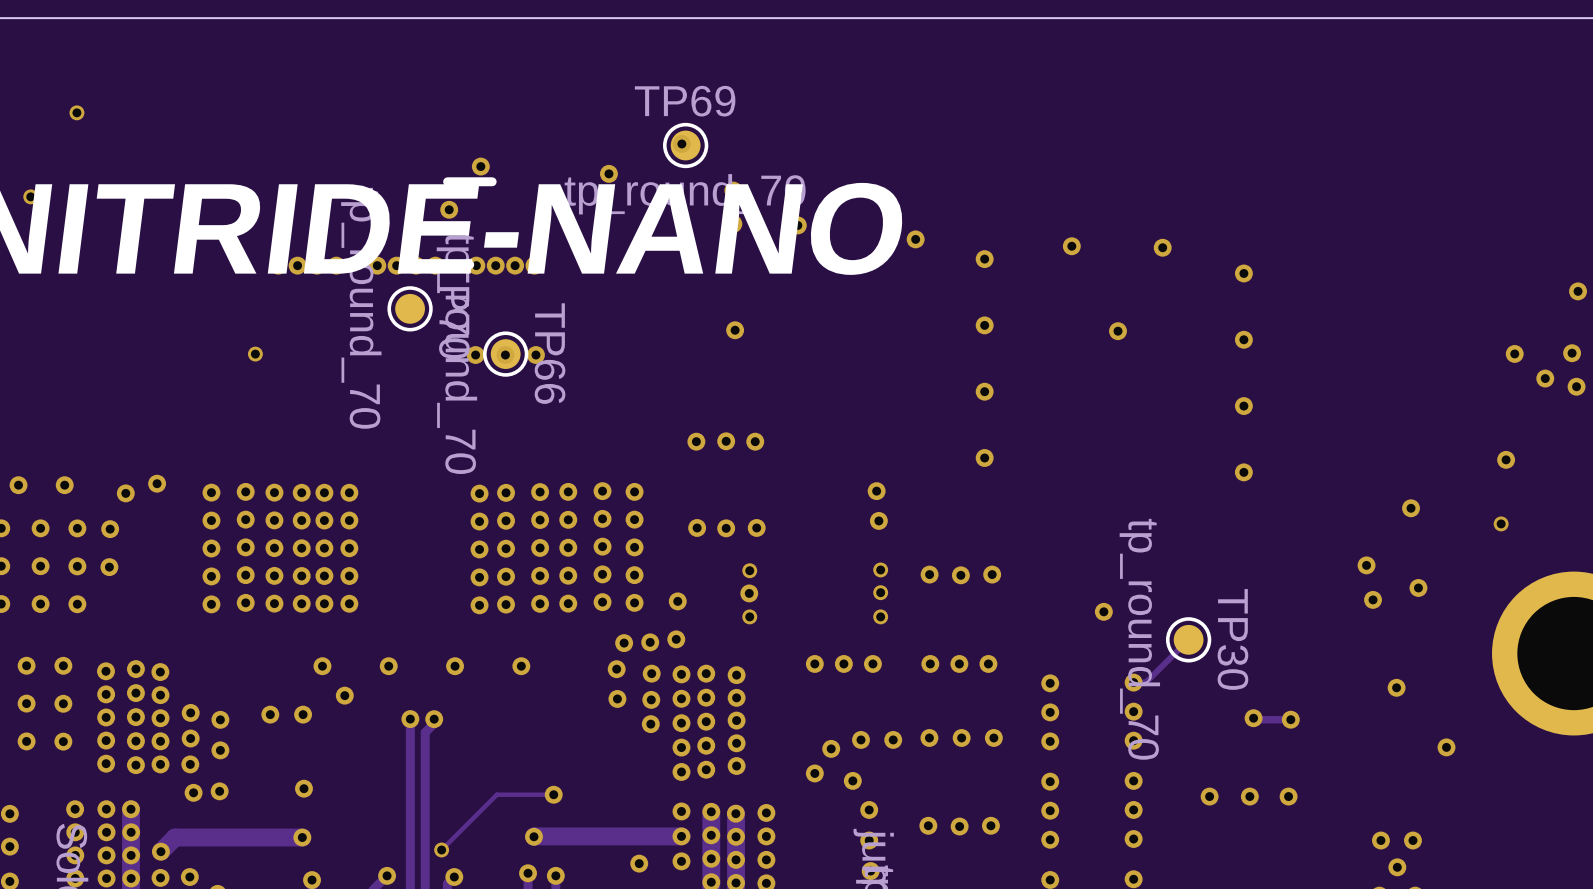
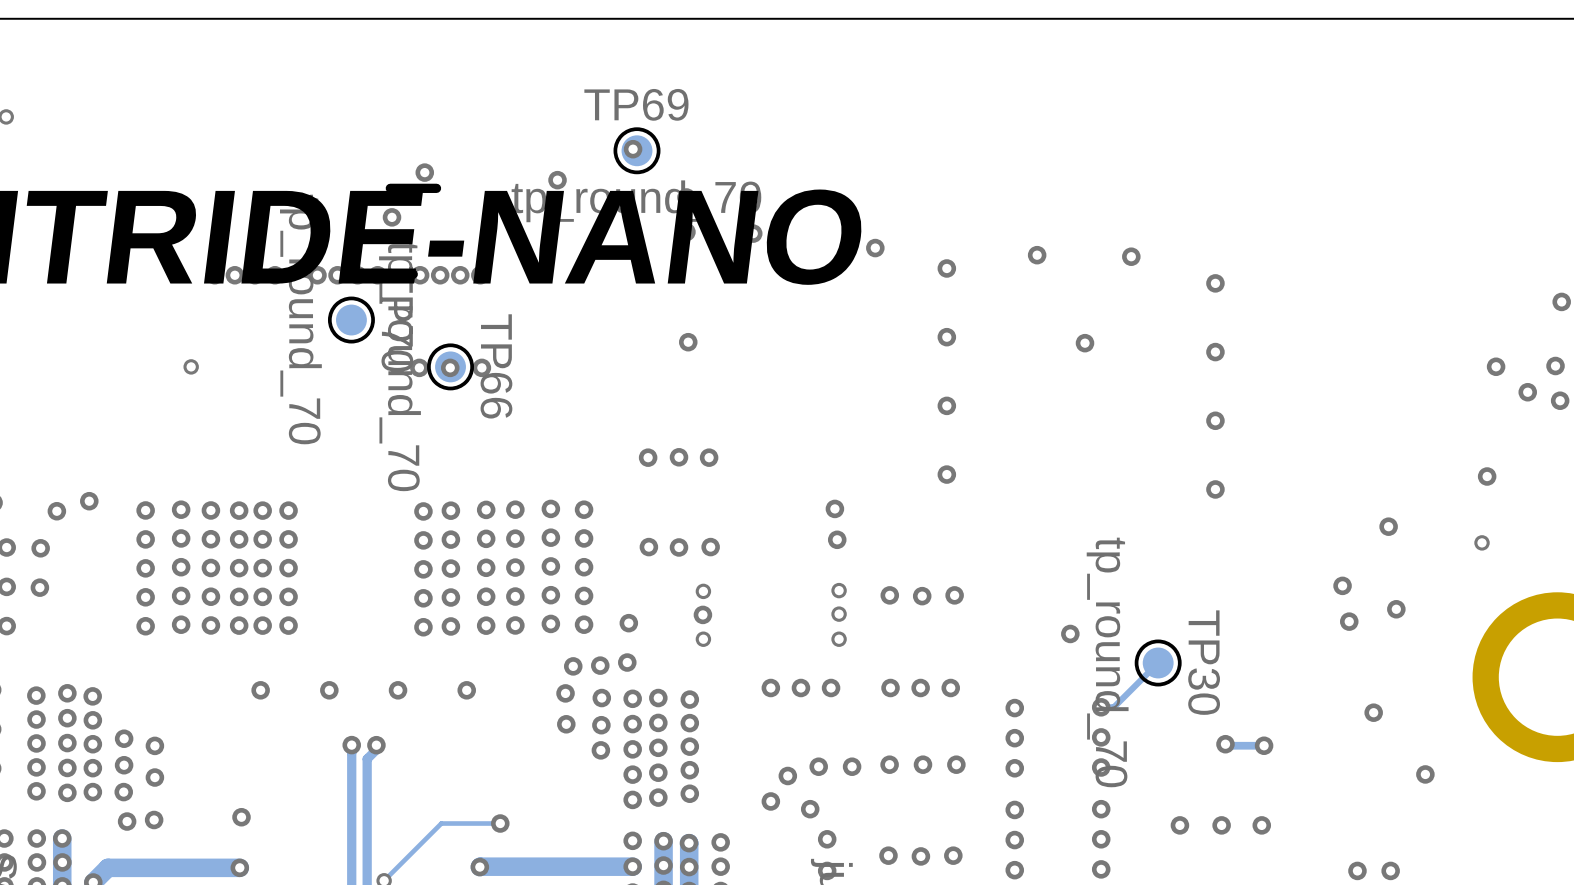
via: (344, 695) -> none
via: (270, 714) -> none
via: (303, 714) -> none

